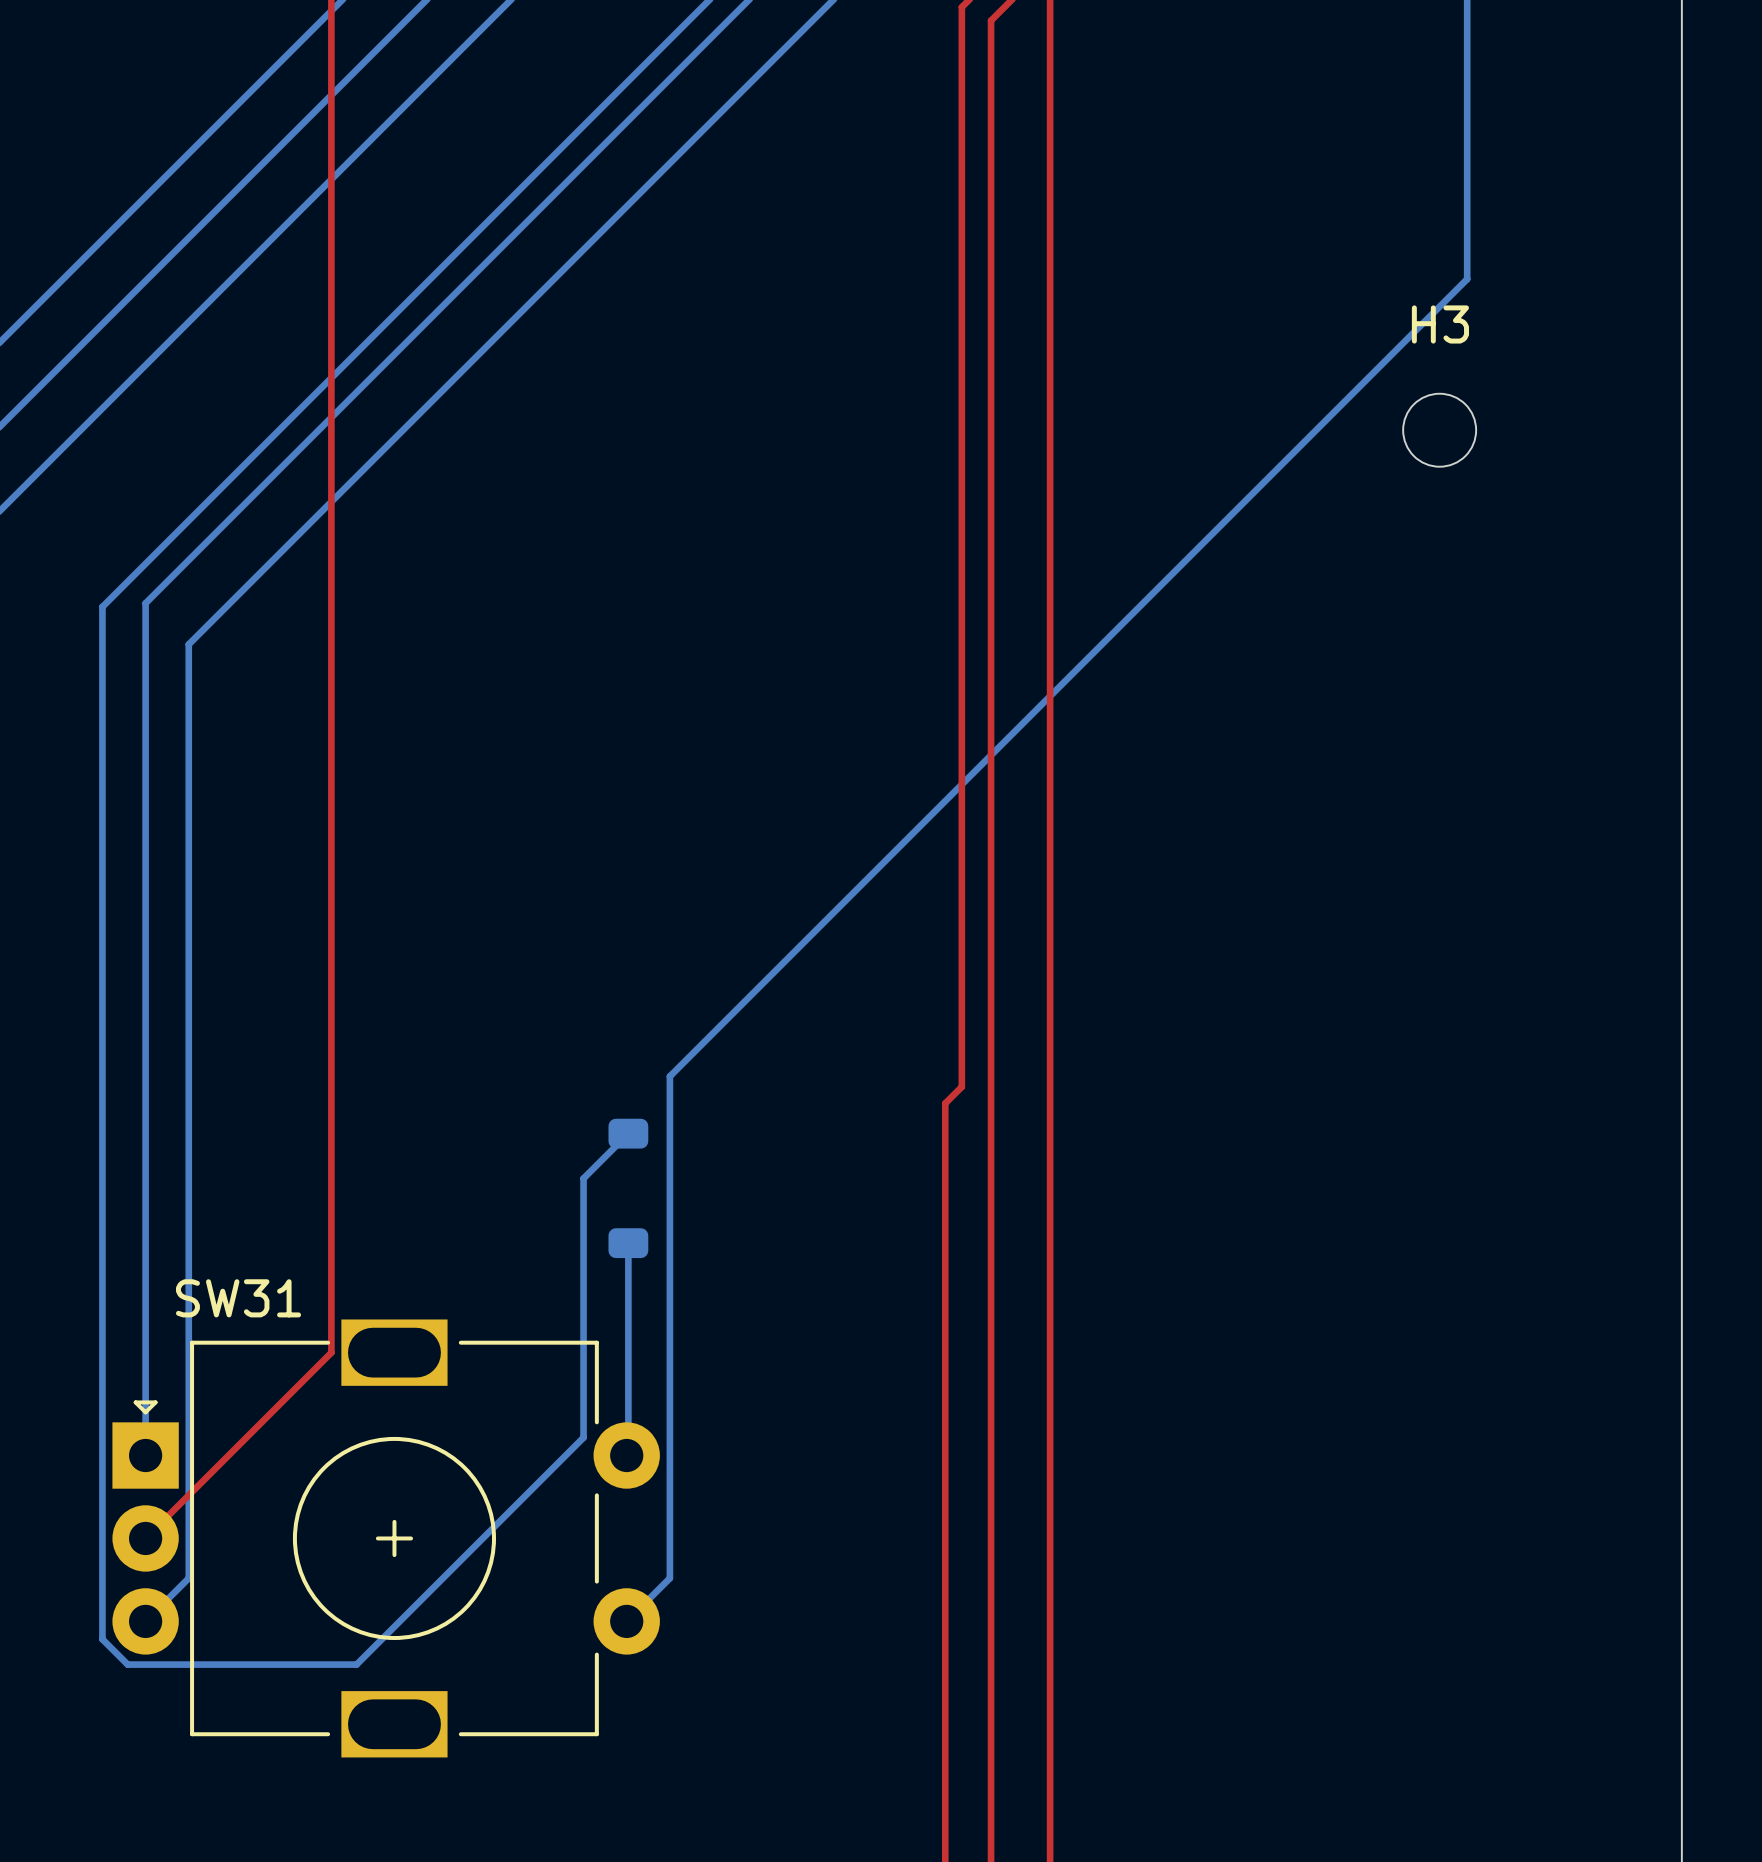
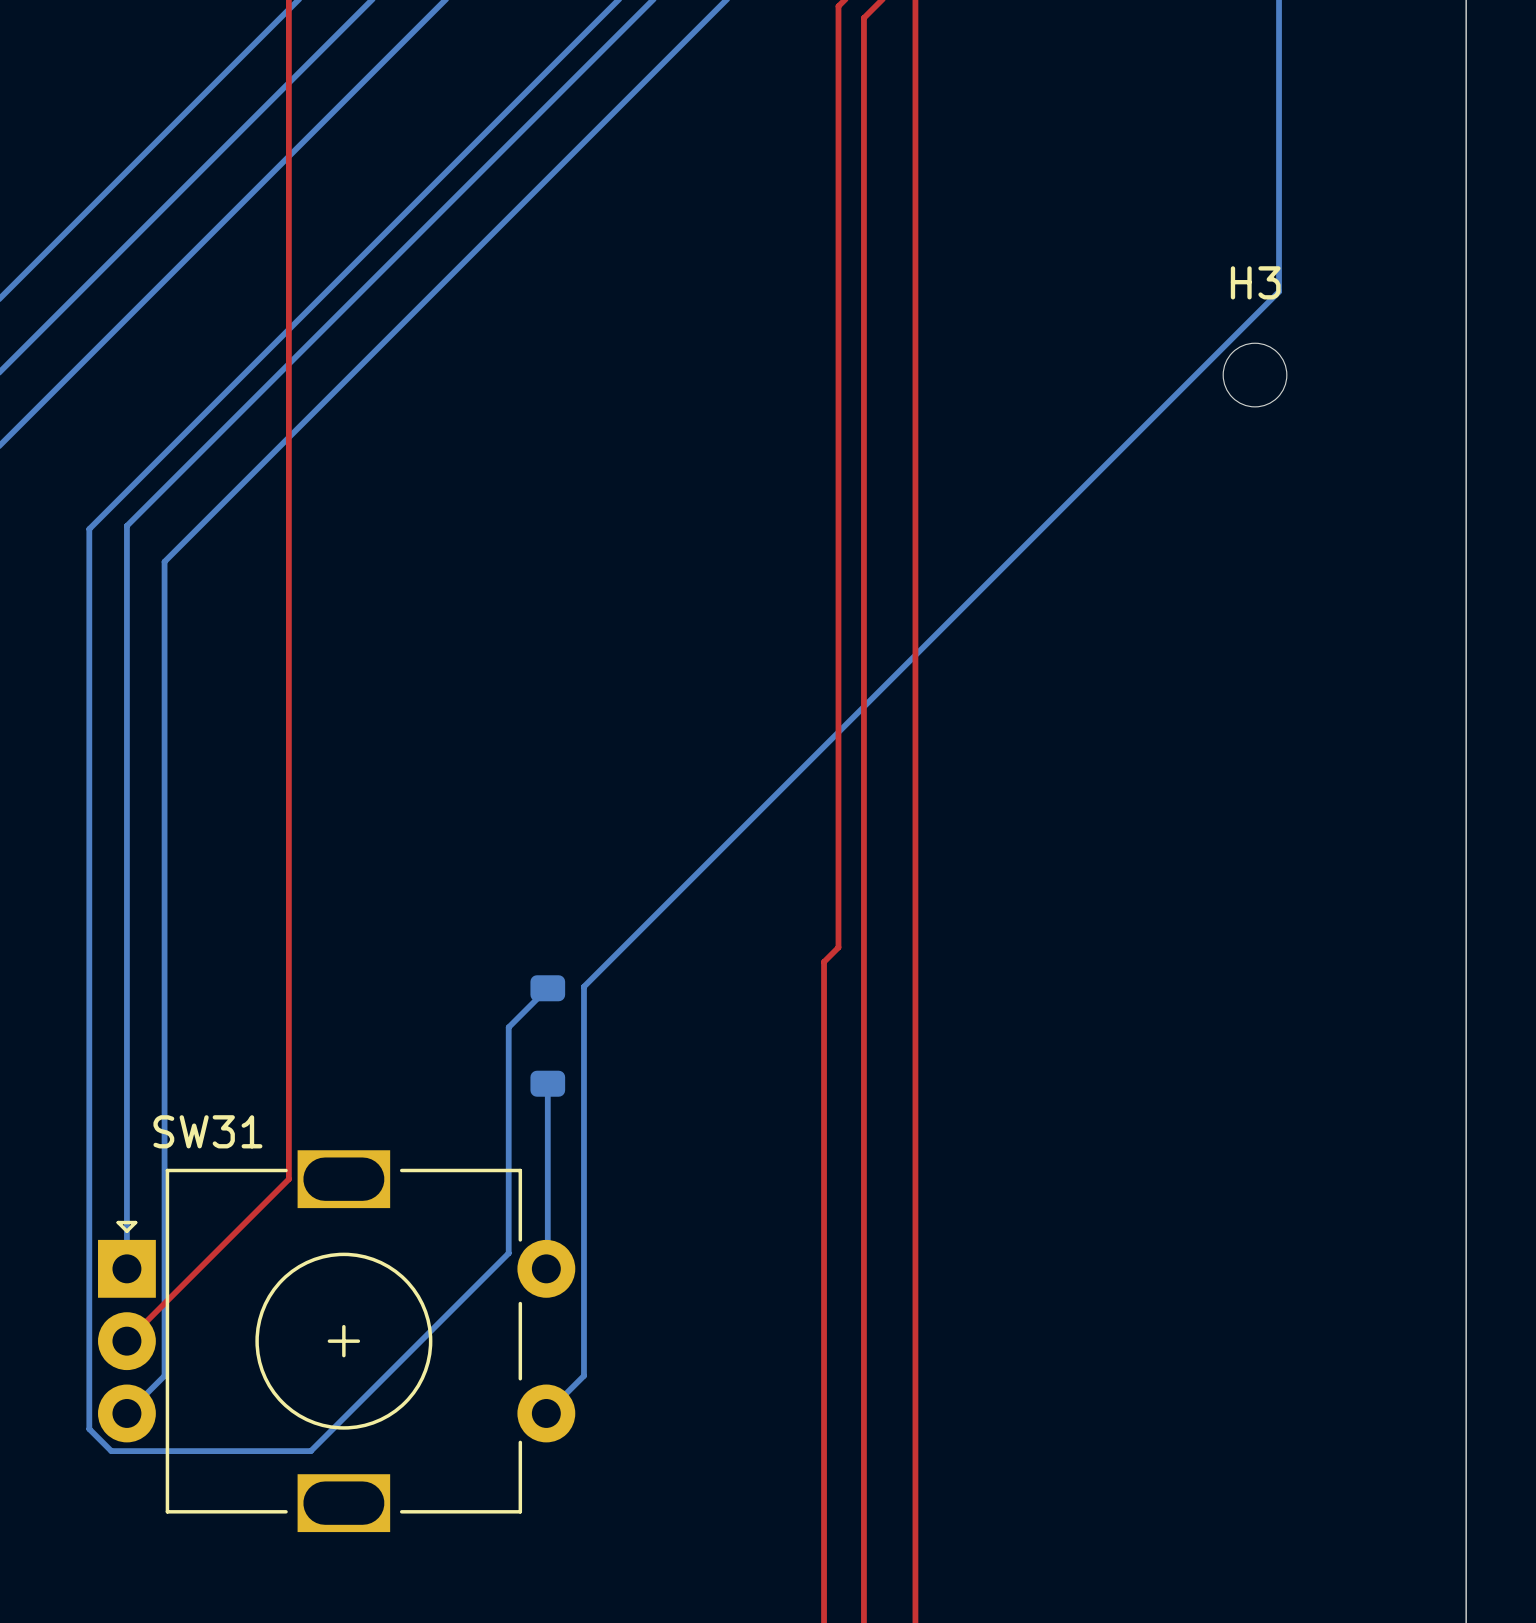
bottom track: (1467, 279) (669, 1076) (669, 1131) -> (1279, 243) (1279, 291) (583, 986)

